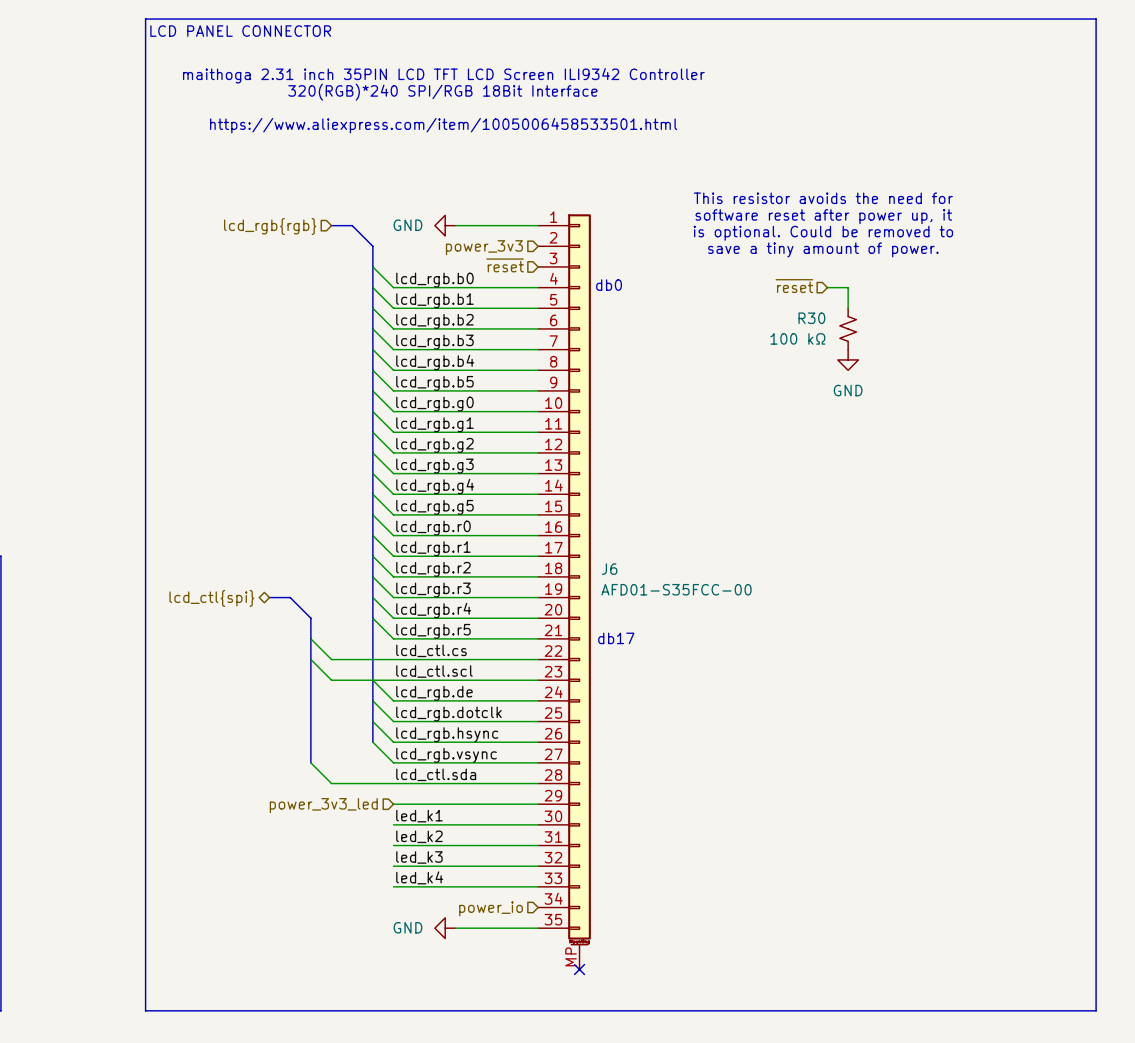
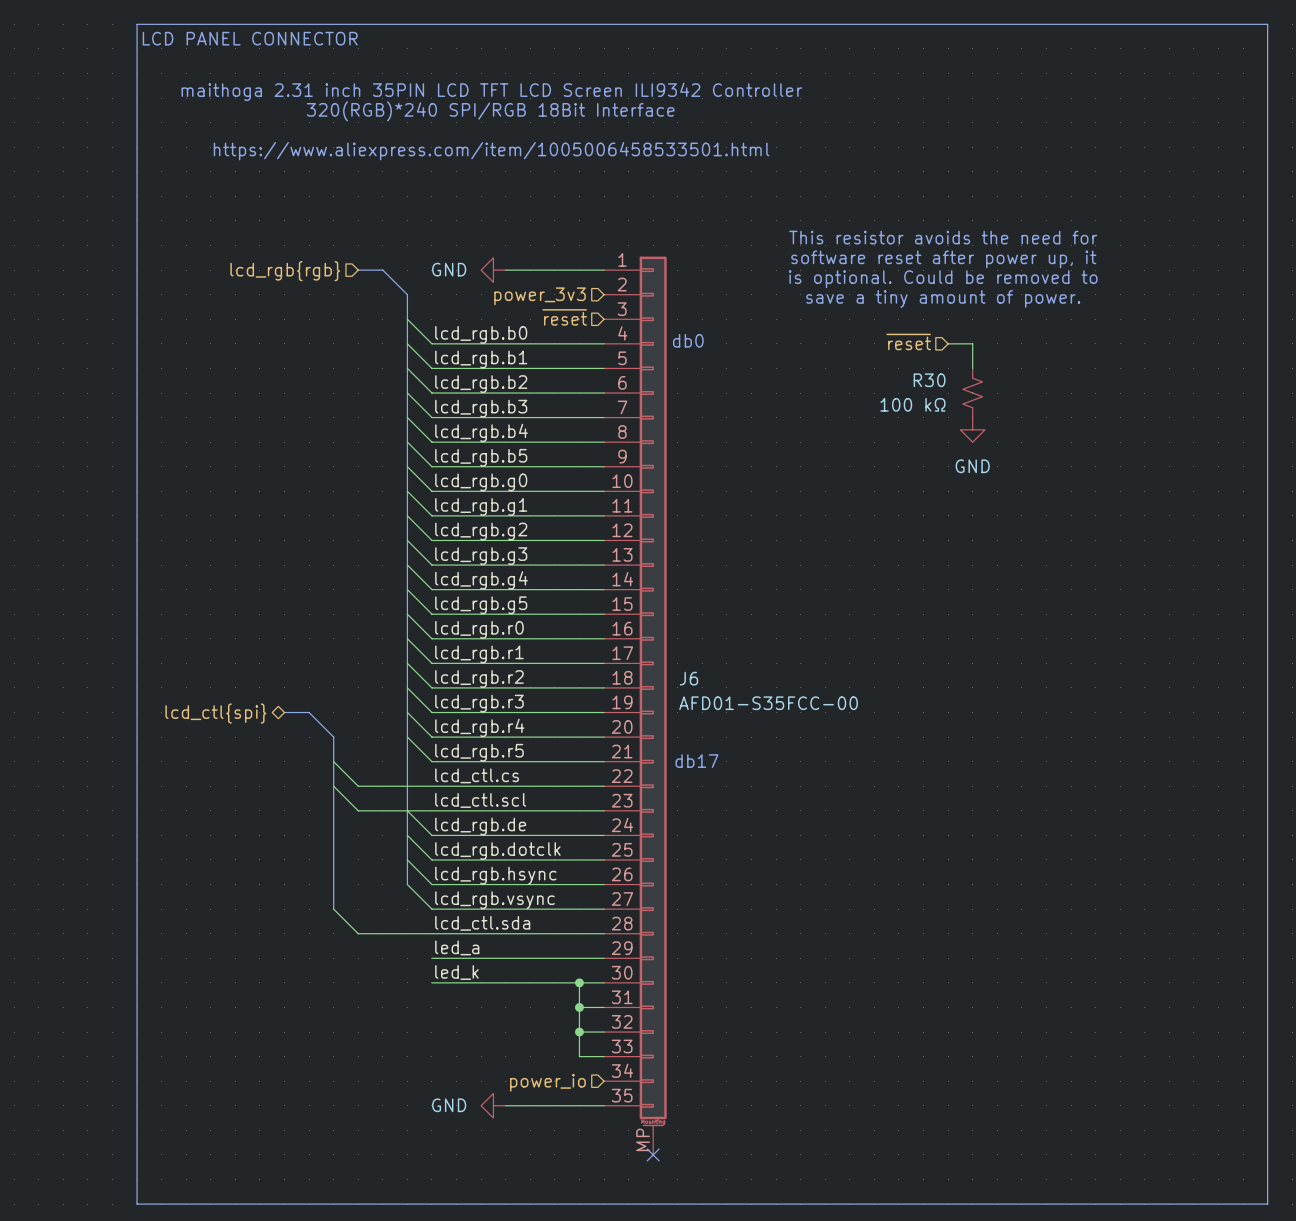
label: none -> led_a (457, 947)
hierarchical label: power_3v3_led (323, 805) -> none
label: led_k1 (419, 816) -> led_k (456, 972)
junction: none -> (579, 982)
label: led_k2 (419, 836) -> none
wire: (393, 845) (517, 845) -> none
junction: none -> (579, 1007)
label: led_k3 (419, 857) -> none
wire: (393, 866) (517, 866) -> none
junction: none -> (579, 1032)
label: led_k4 (419, 877) -> none
wire: (393, 886) (517, 886) -> (579, 982) (579, 1056)

